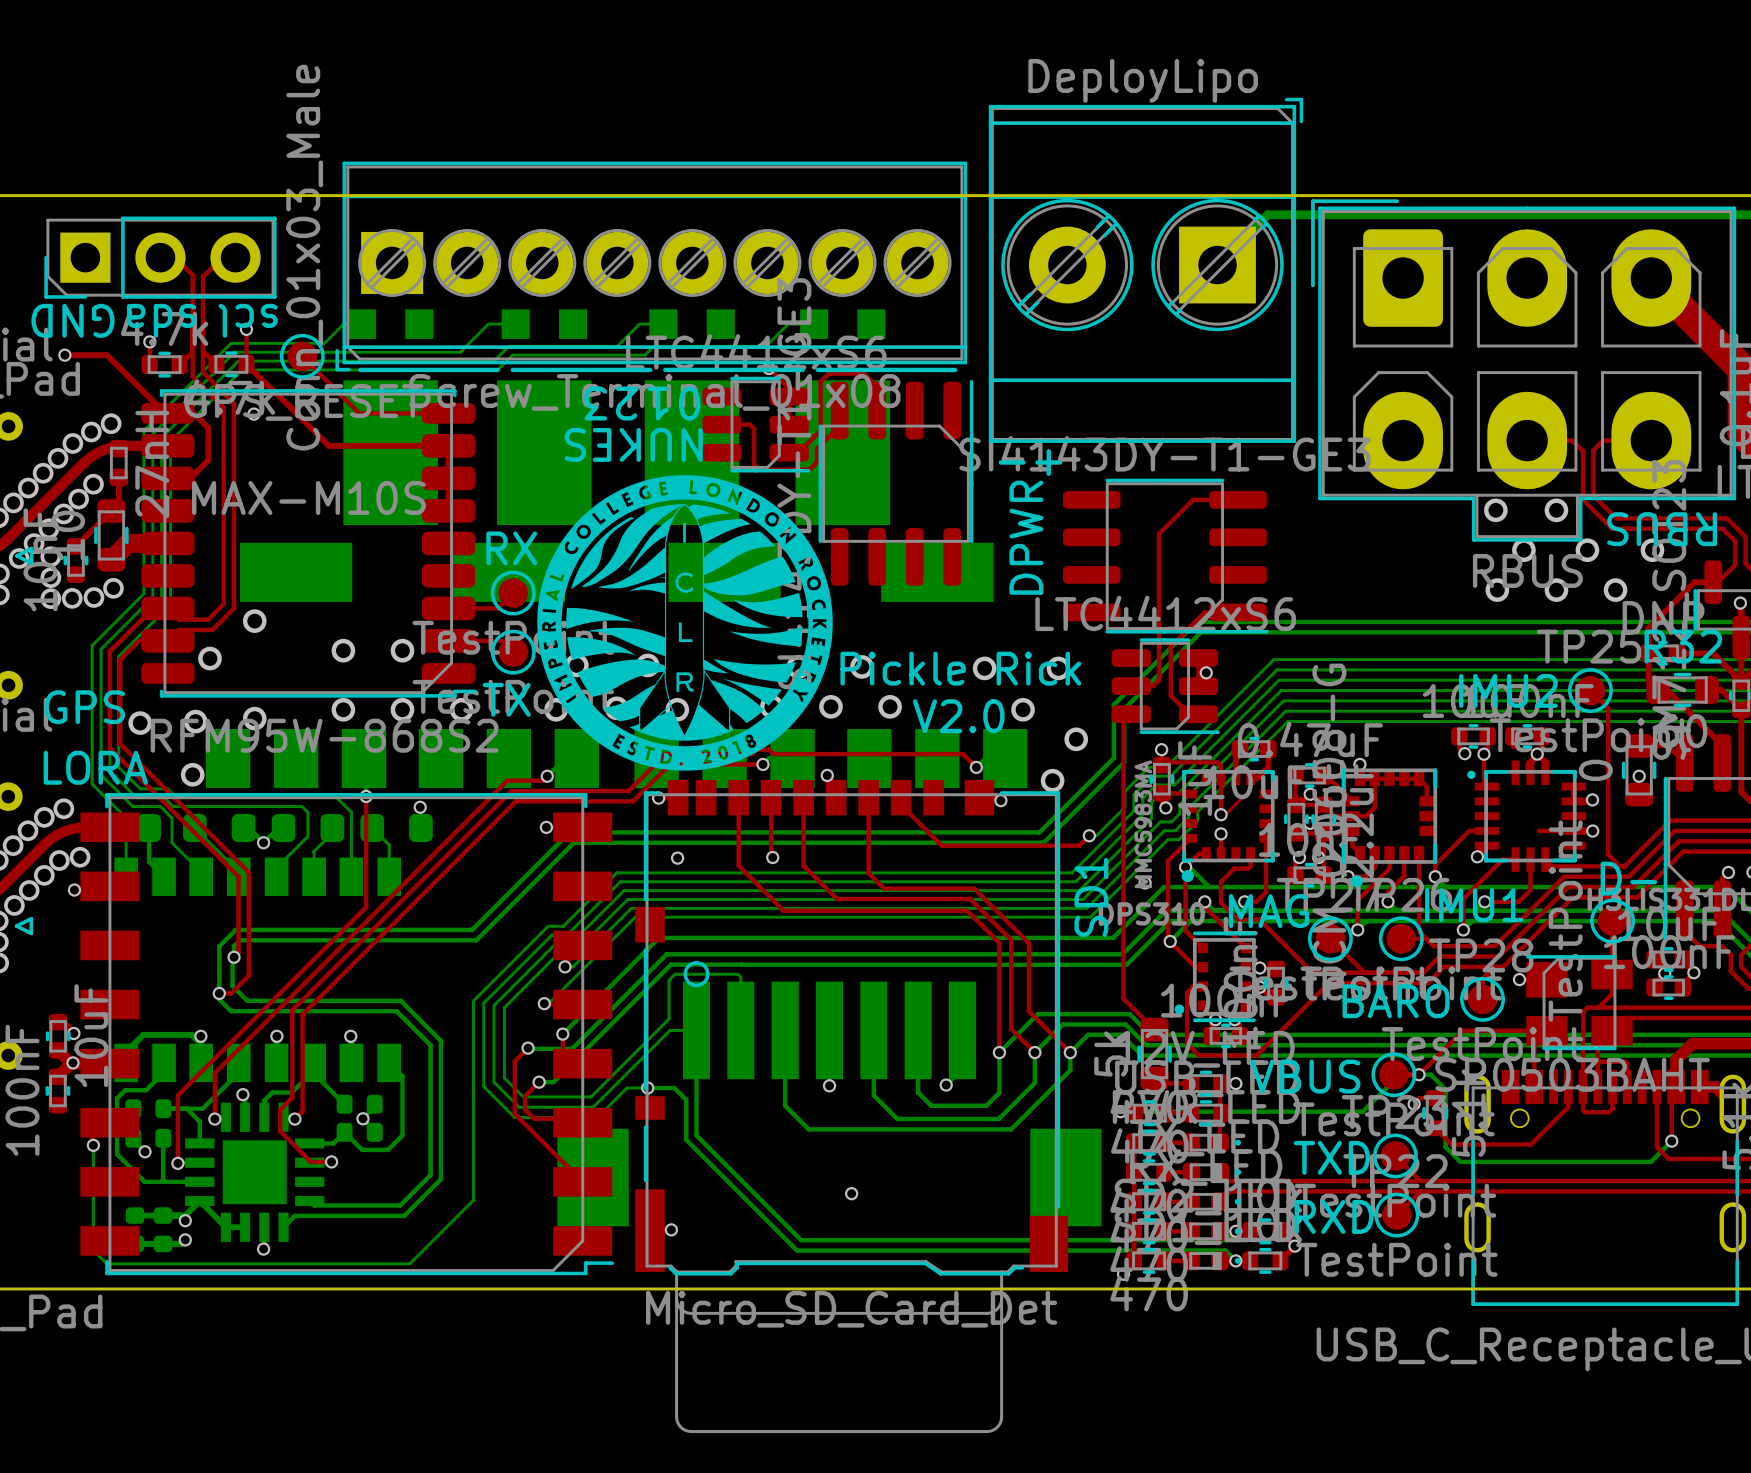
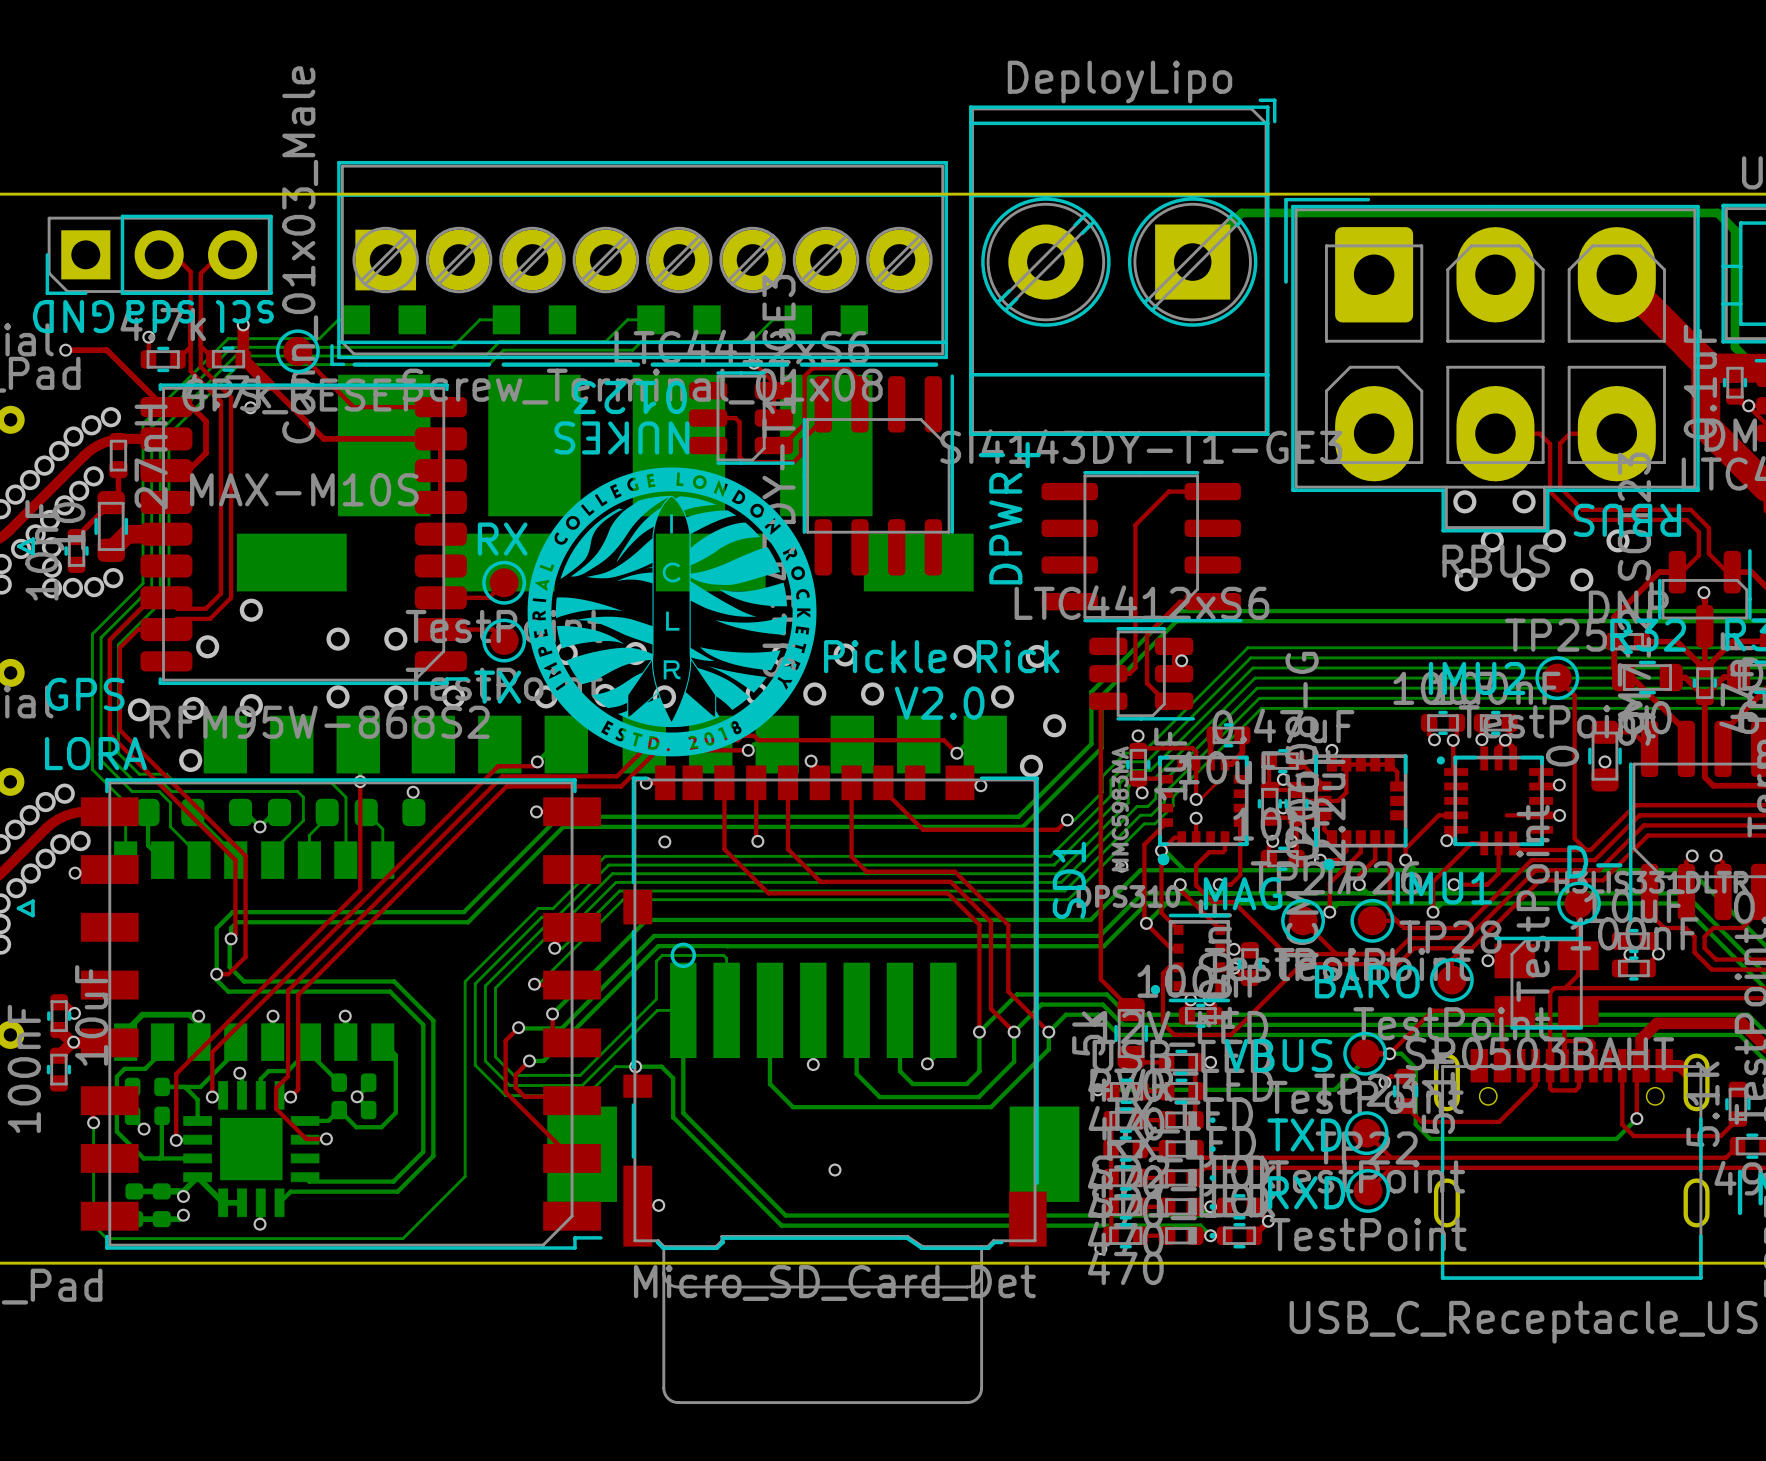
top track width: thin (246, 329) (246, 364) (273, 391) -> thick (243, 324) (243, 359) (269, 385)
via: none -> (1481, 739)

